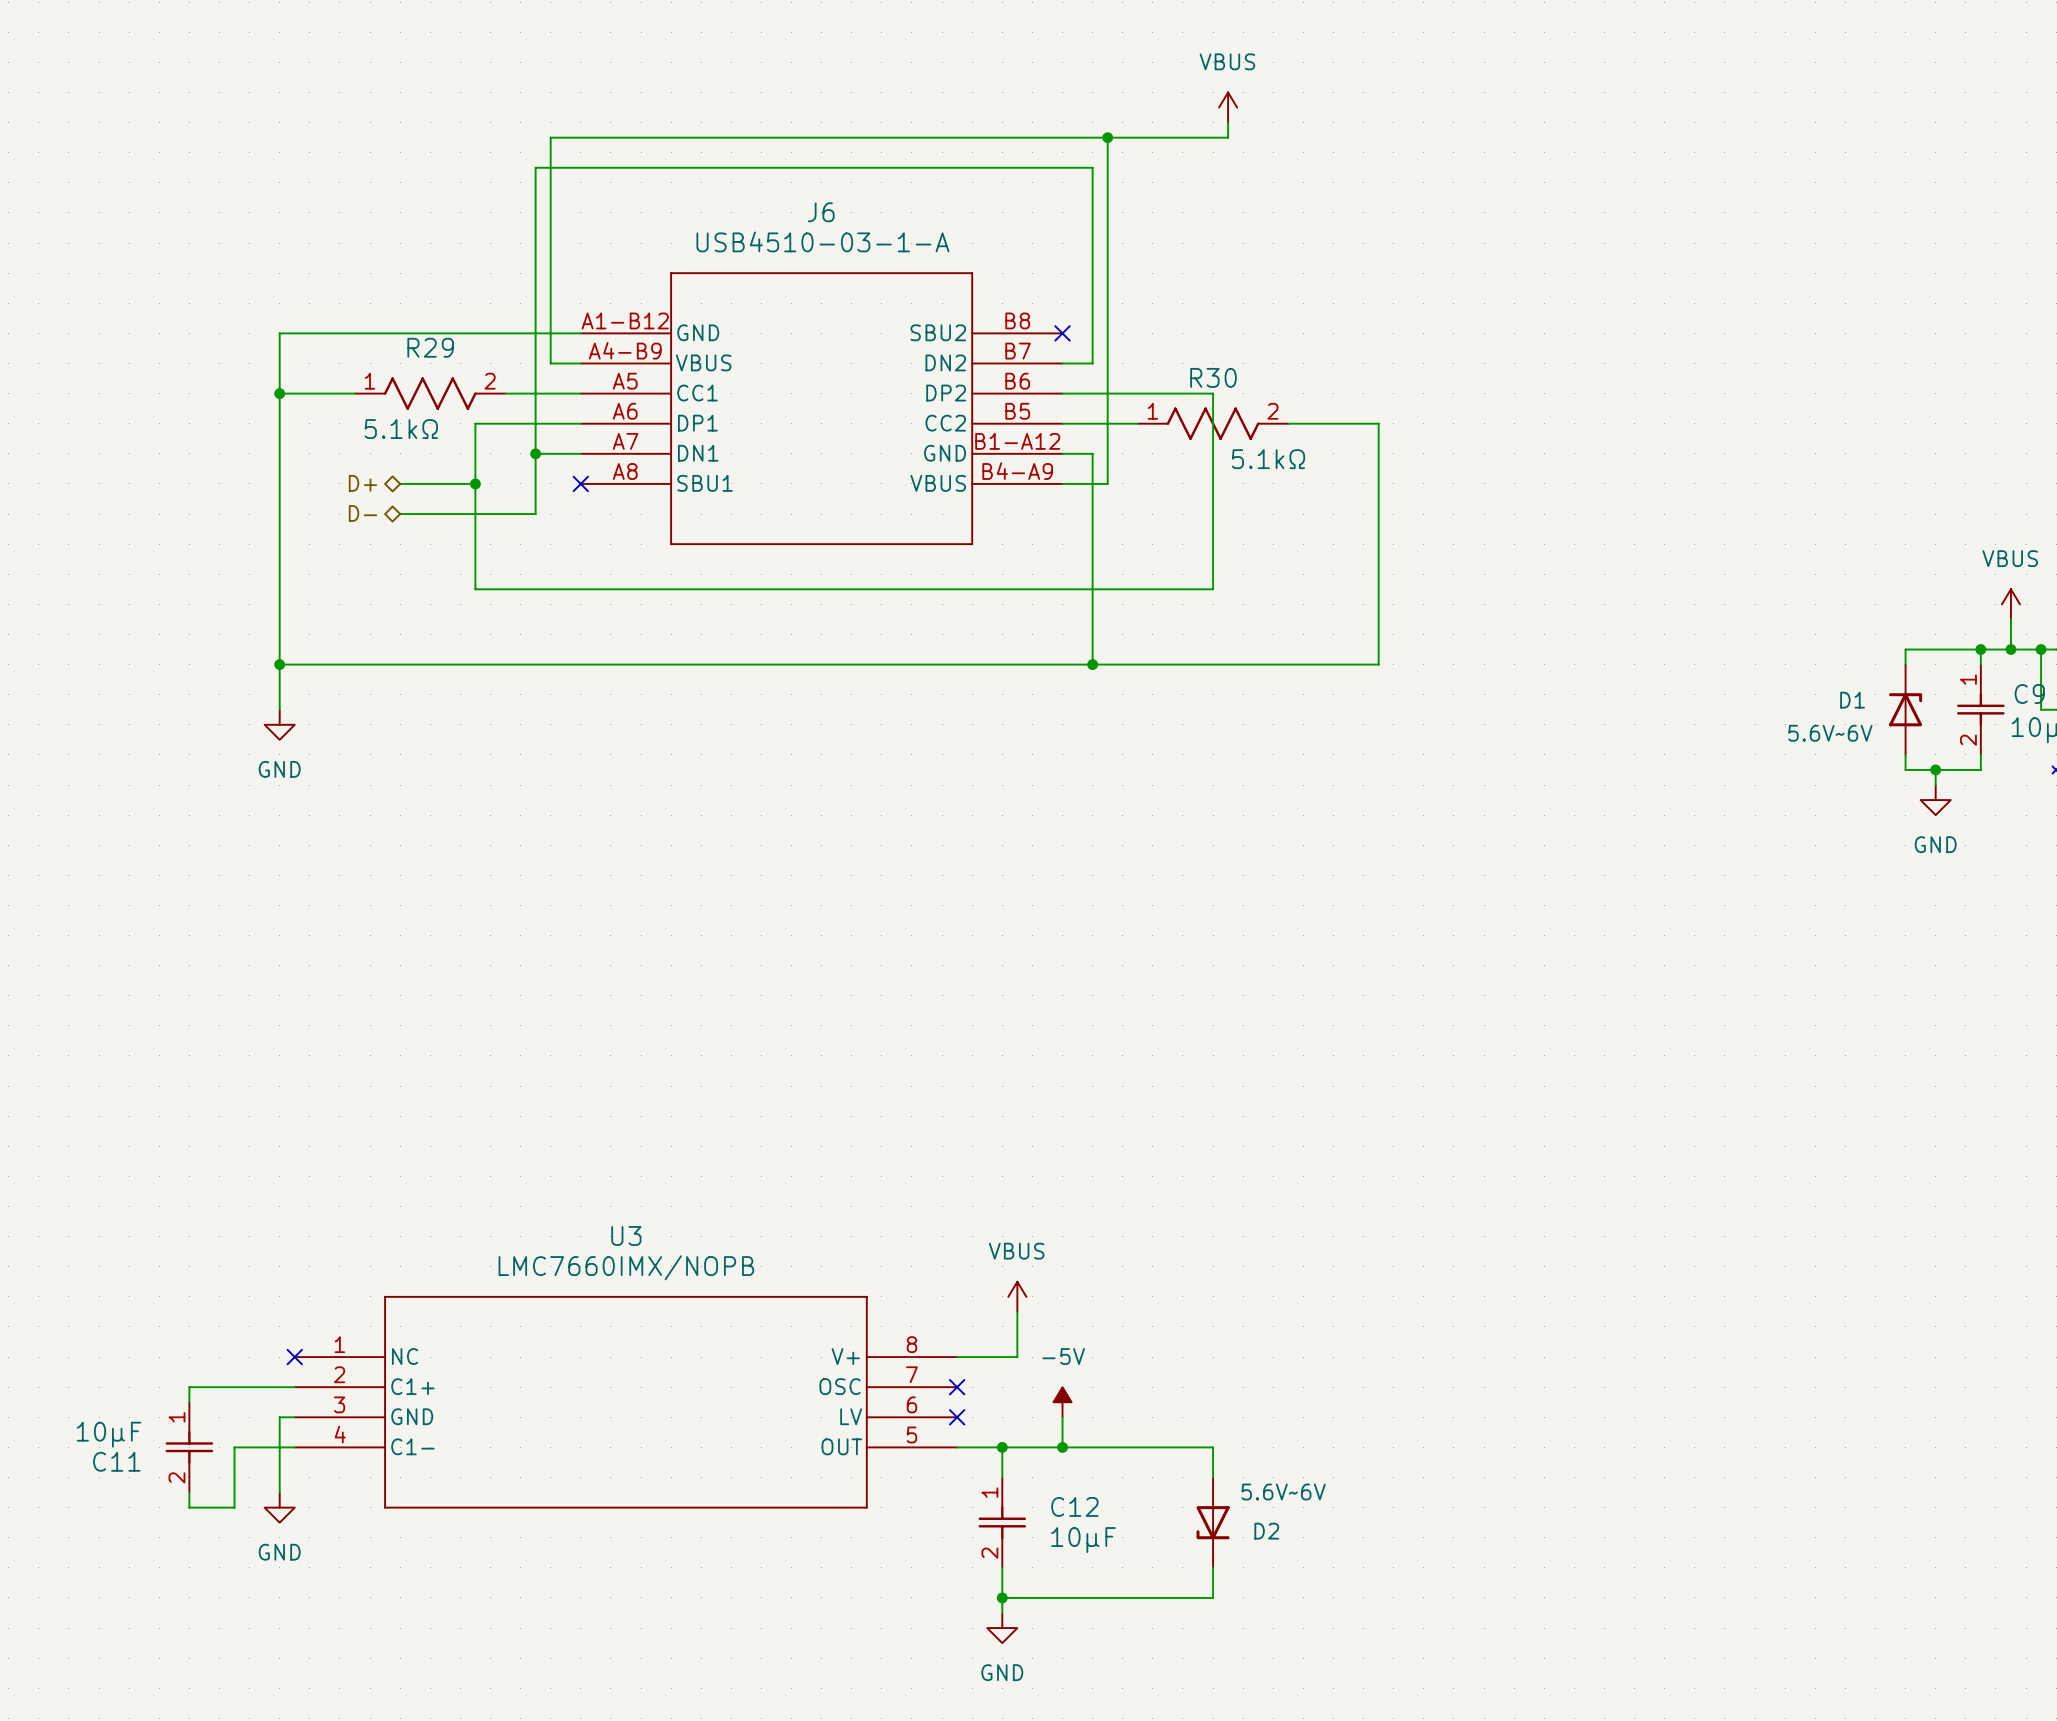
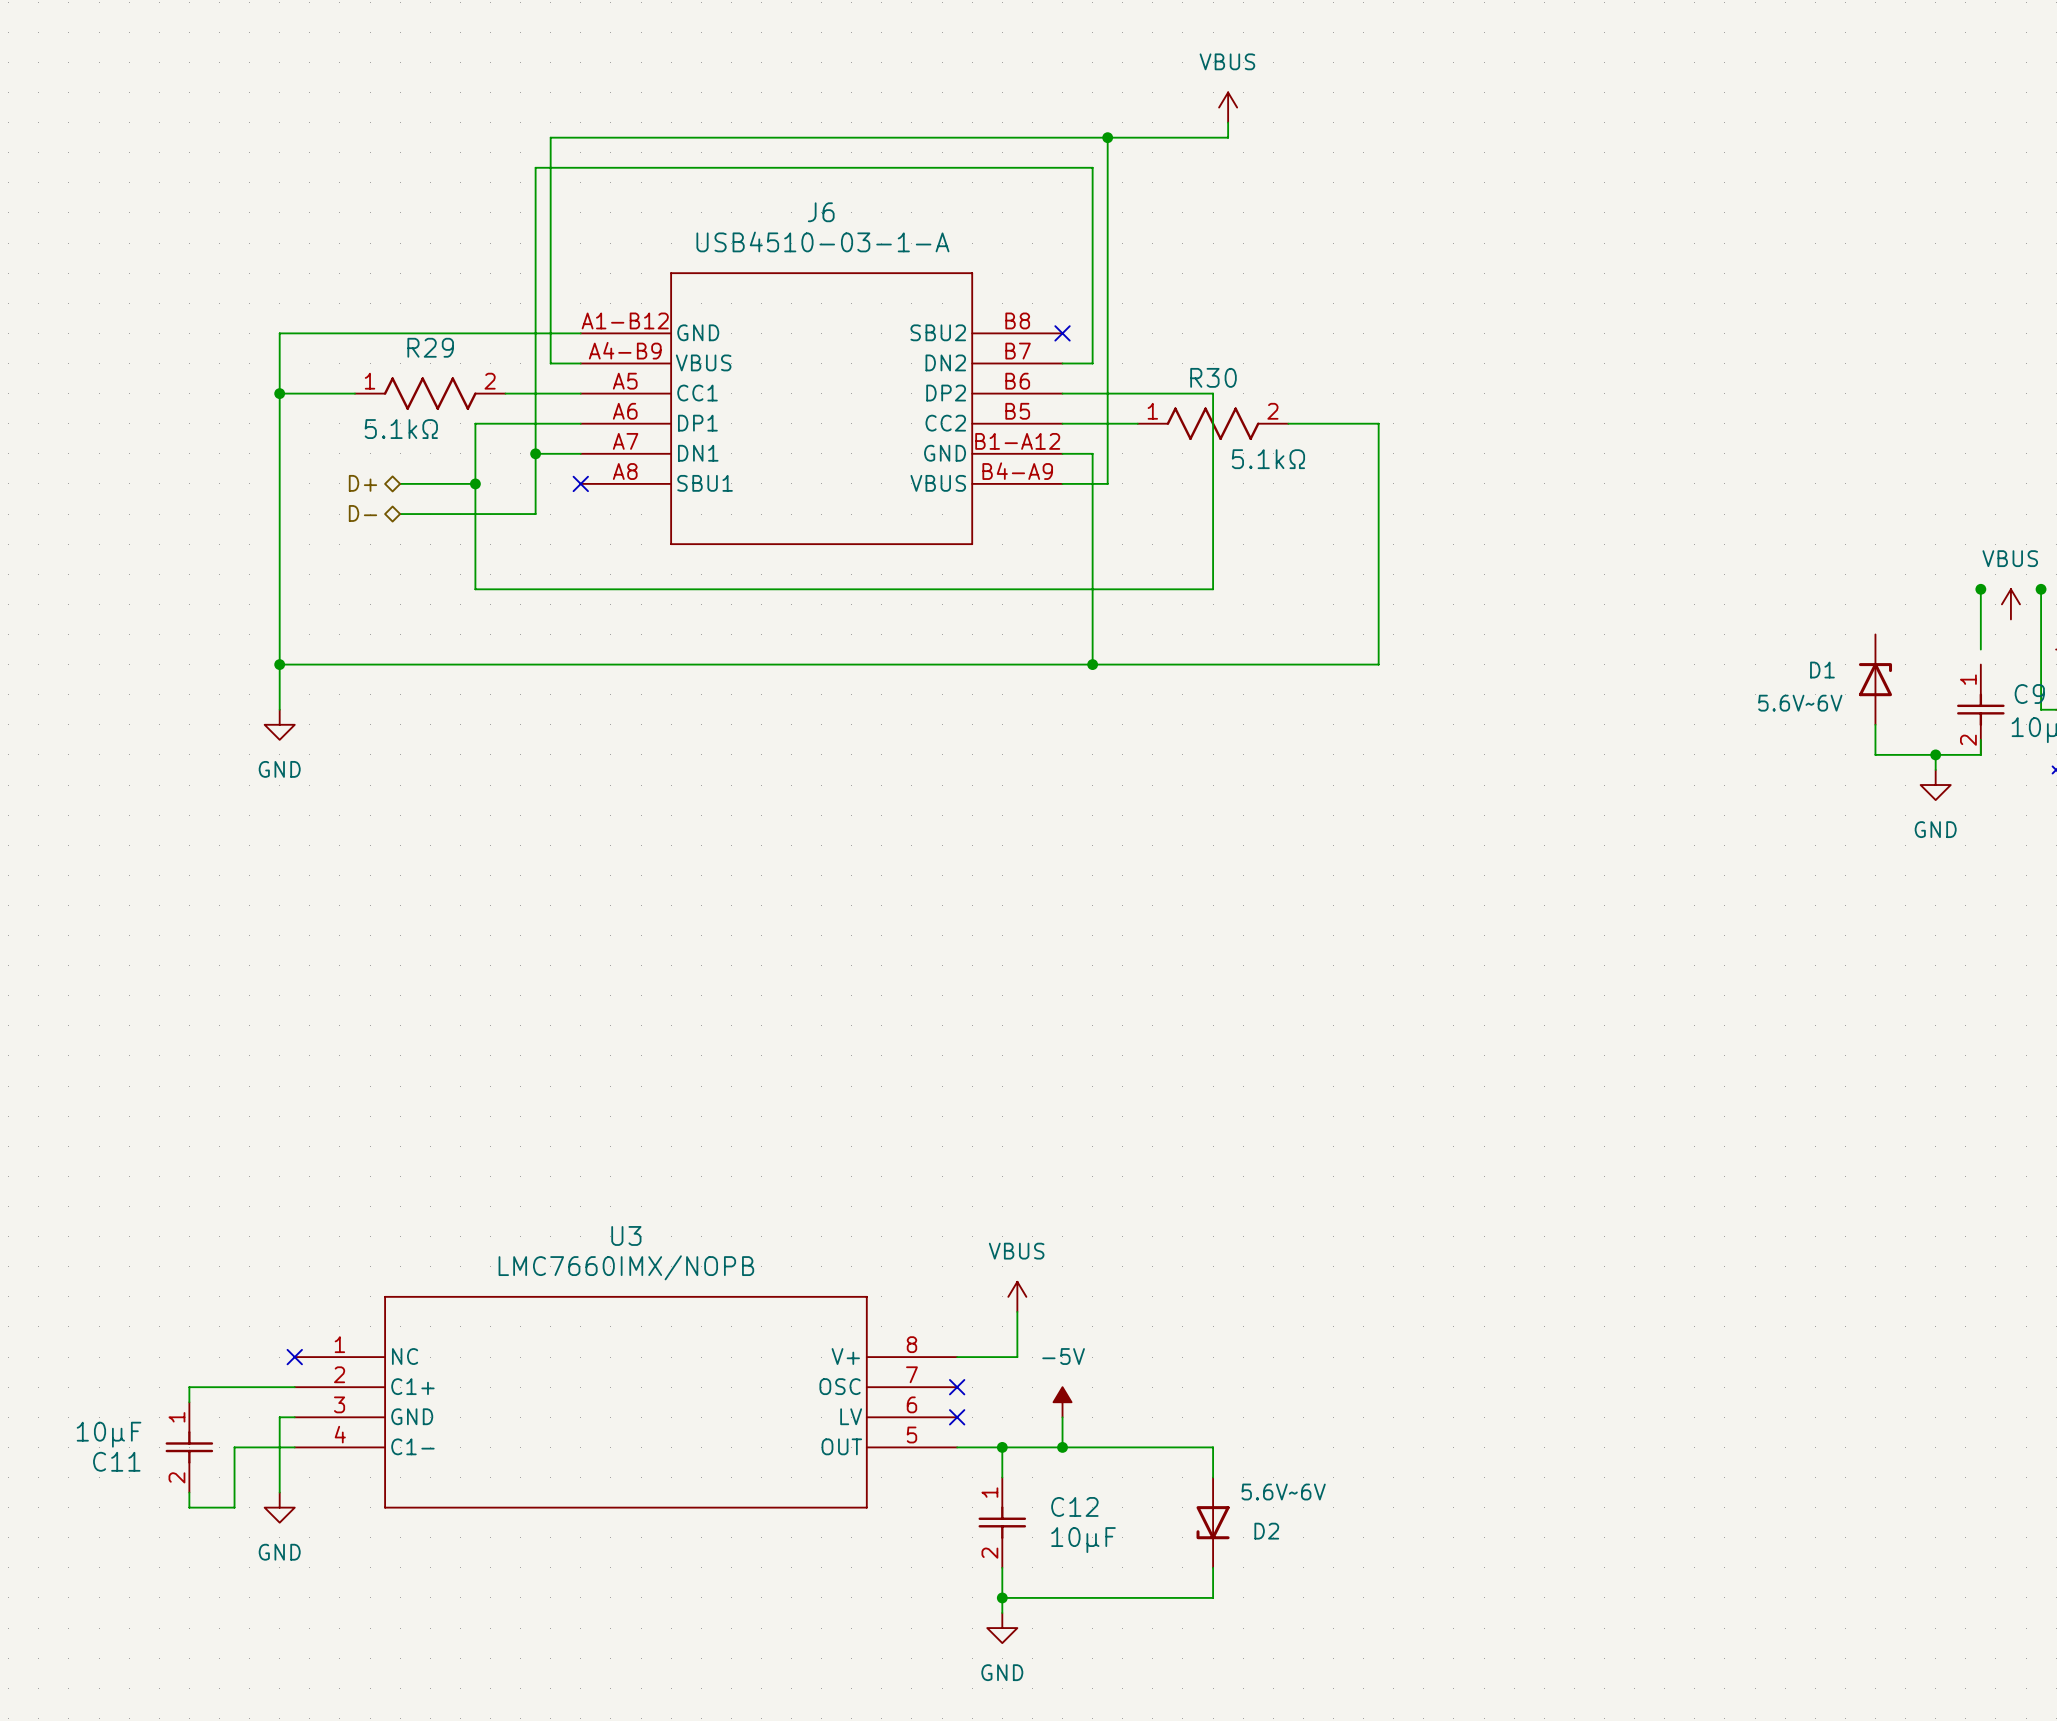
junction: none -> (1980, 589)
wire: none -> (2041, 589) (2041, 649)
junction: none -> (2041, 589)
wire: (2010, 619) (2010, 649) -> none
wire: (1980, 649) (1980, 664) -> (1980, 649) (1980, 589)
junction: (1980, 649) -> none
junction: (2010, 649) -> none
junction: (2041, 649) -> none
wire: (2056, 649) (1905, 649) (1905, 664) -> none
D1 position: (1905, 709) -> (1875, 679)
wire: none -> (1875, 724) (1875, 754) (1980, 754) (1980, 739)
wire: (1905, 754) (1905, 769) (1980, 769) (1980, 754) -> none
junction position: (1935, 769) -> (1935, 754)
power symbol position: GND (1935, 800) -> GND (1935, 785)

